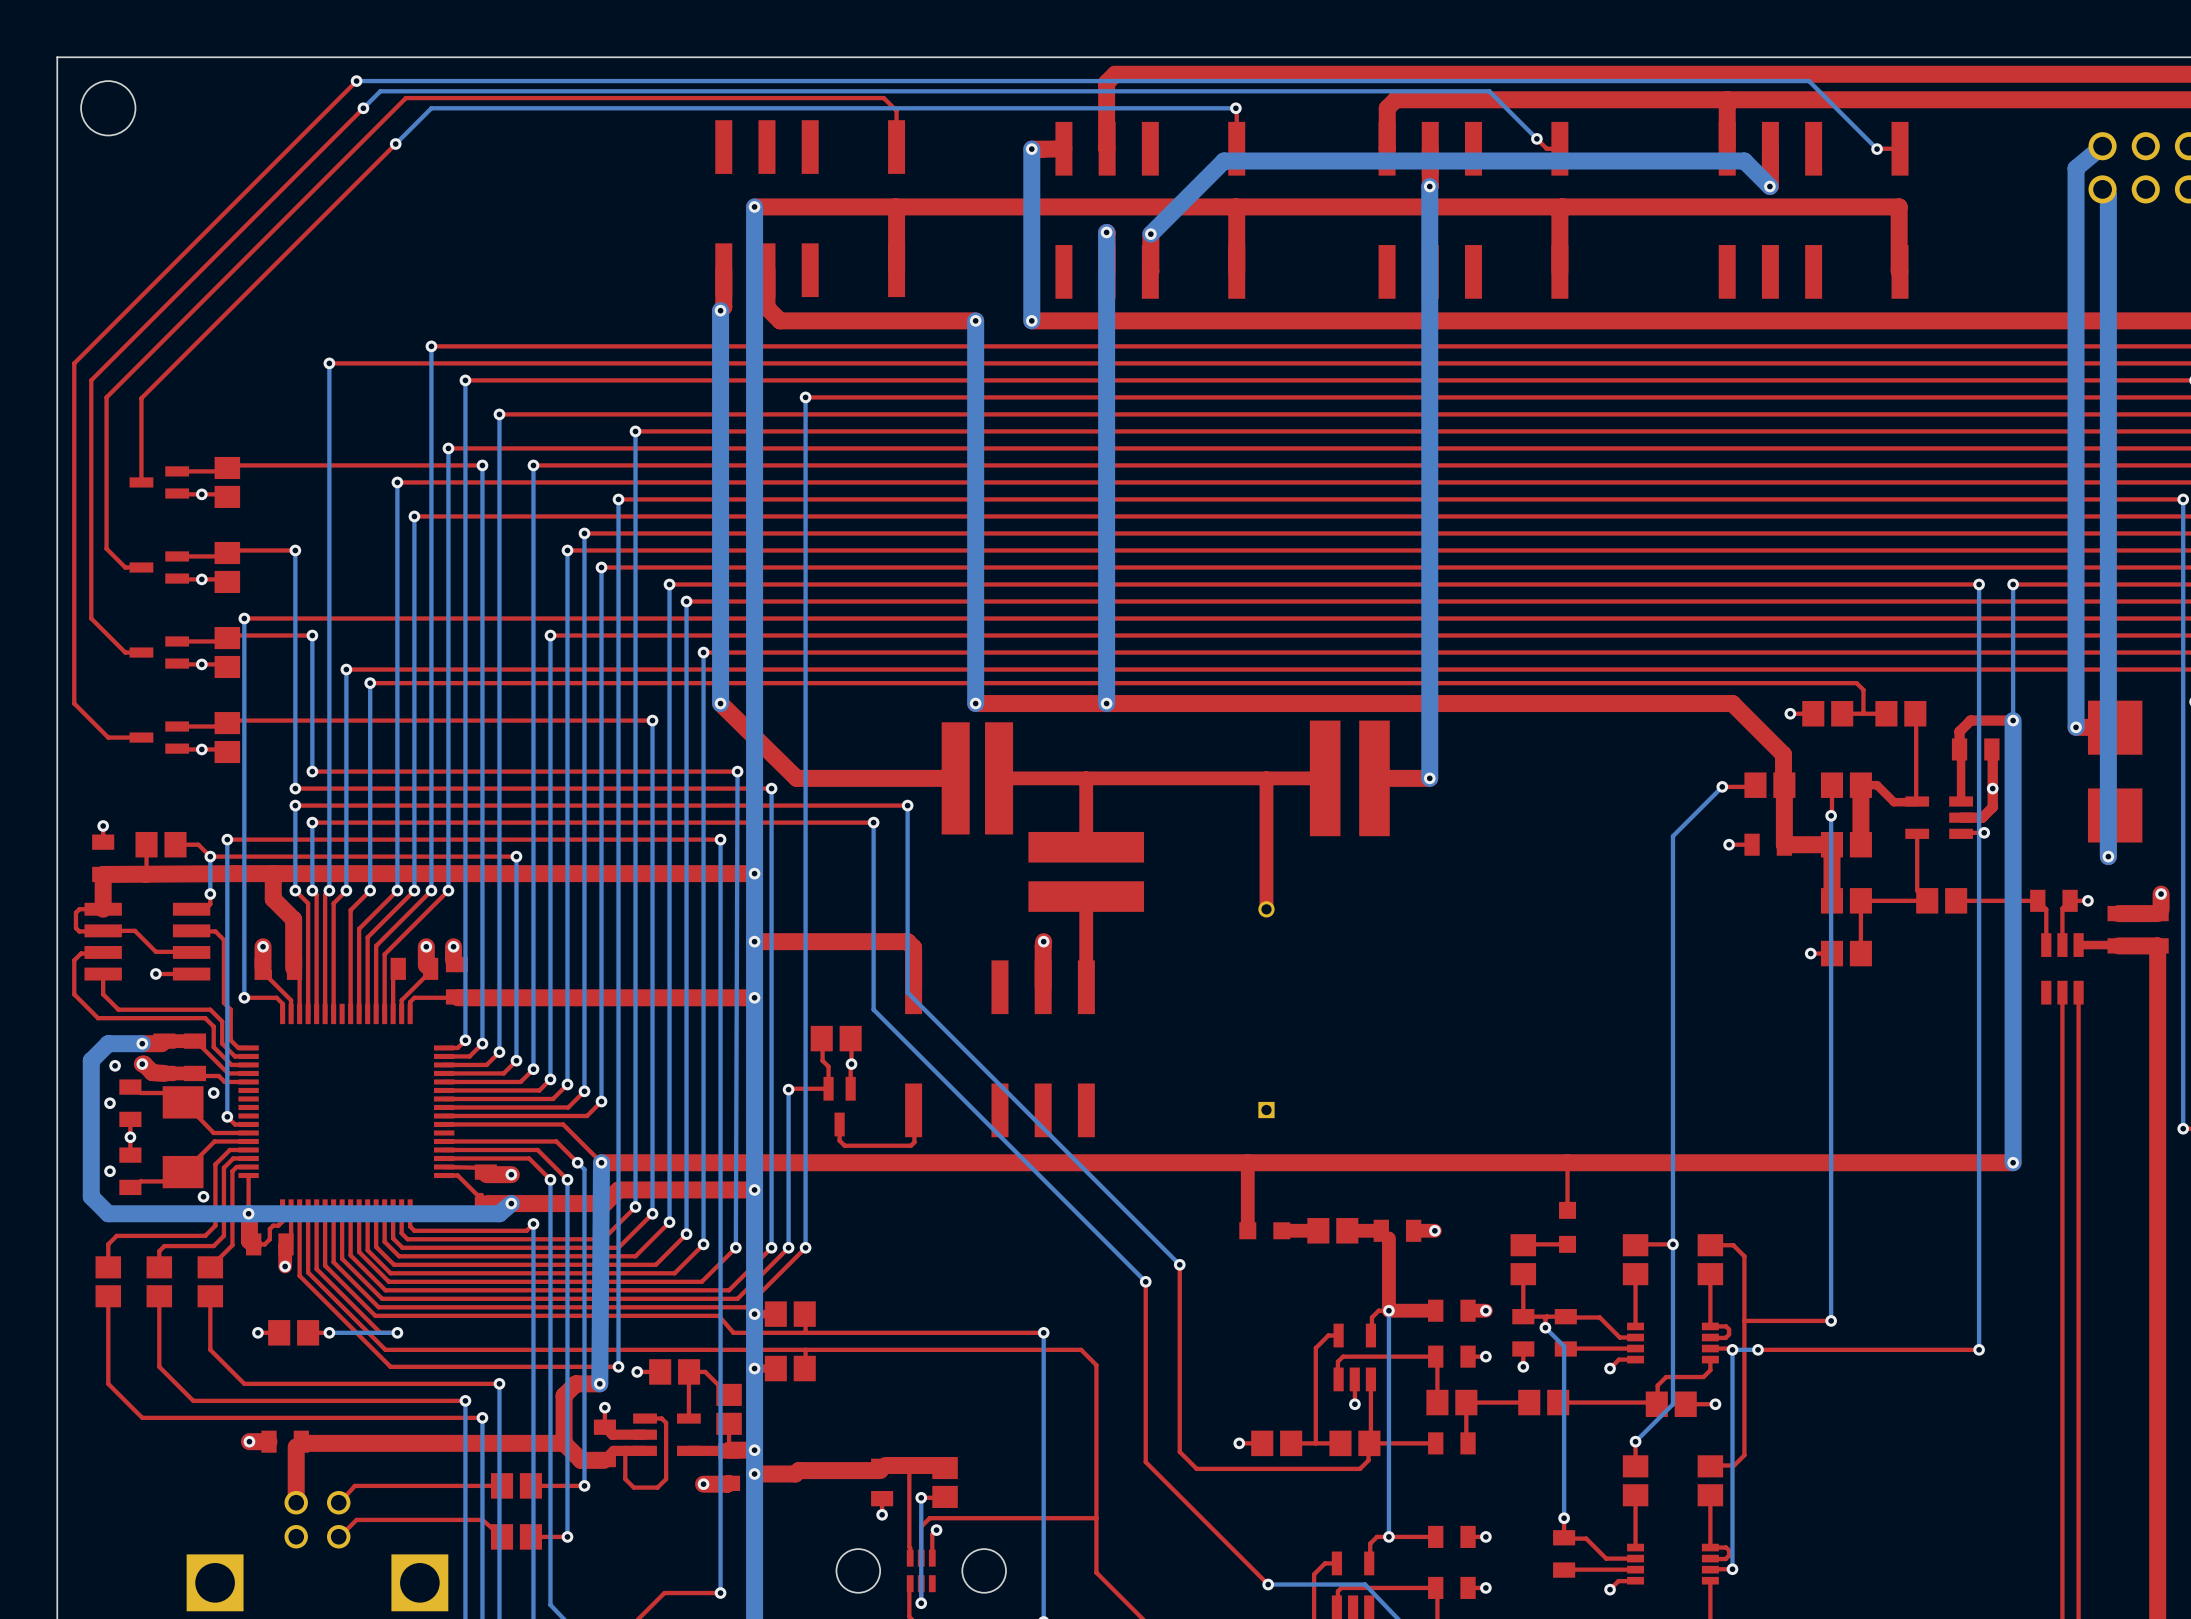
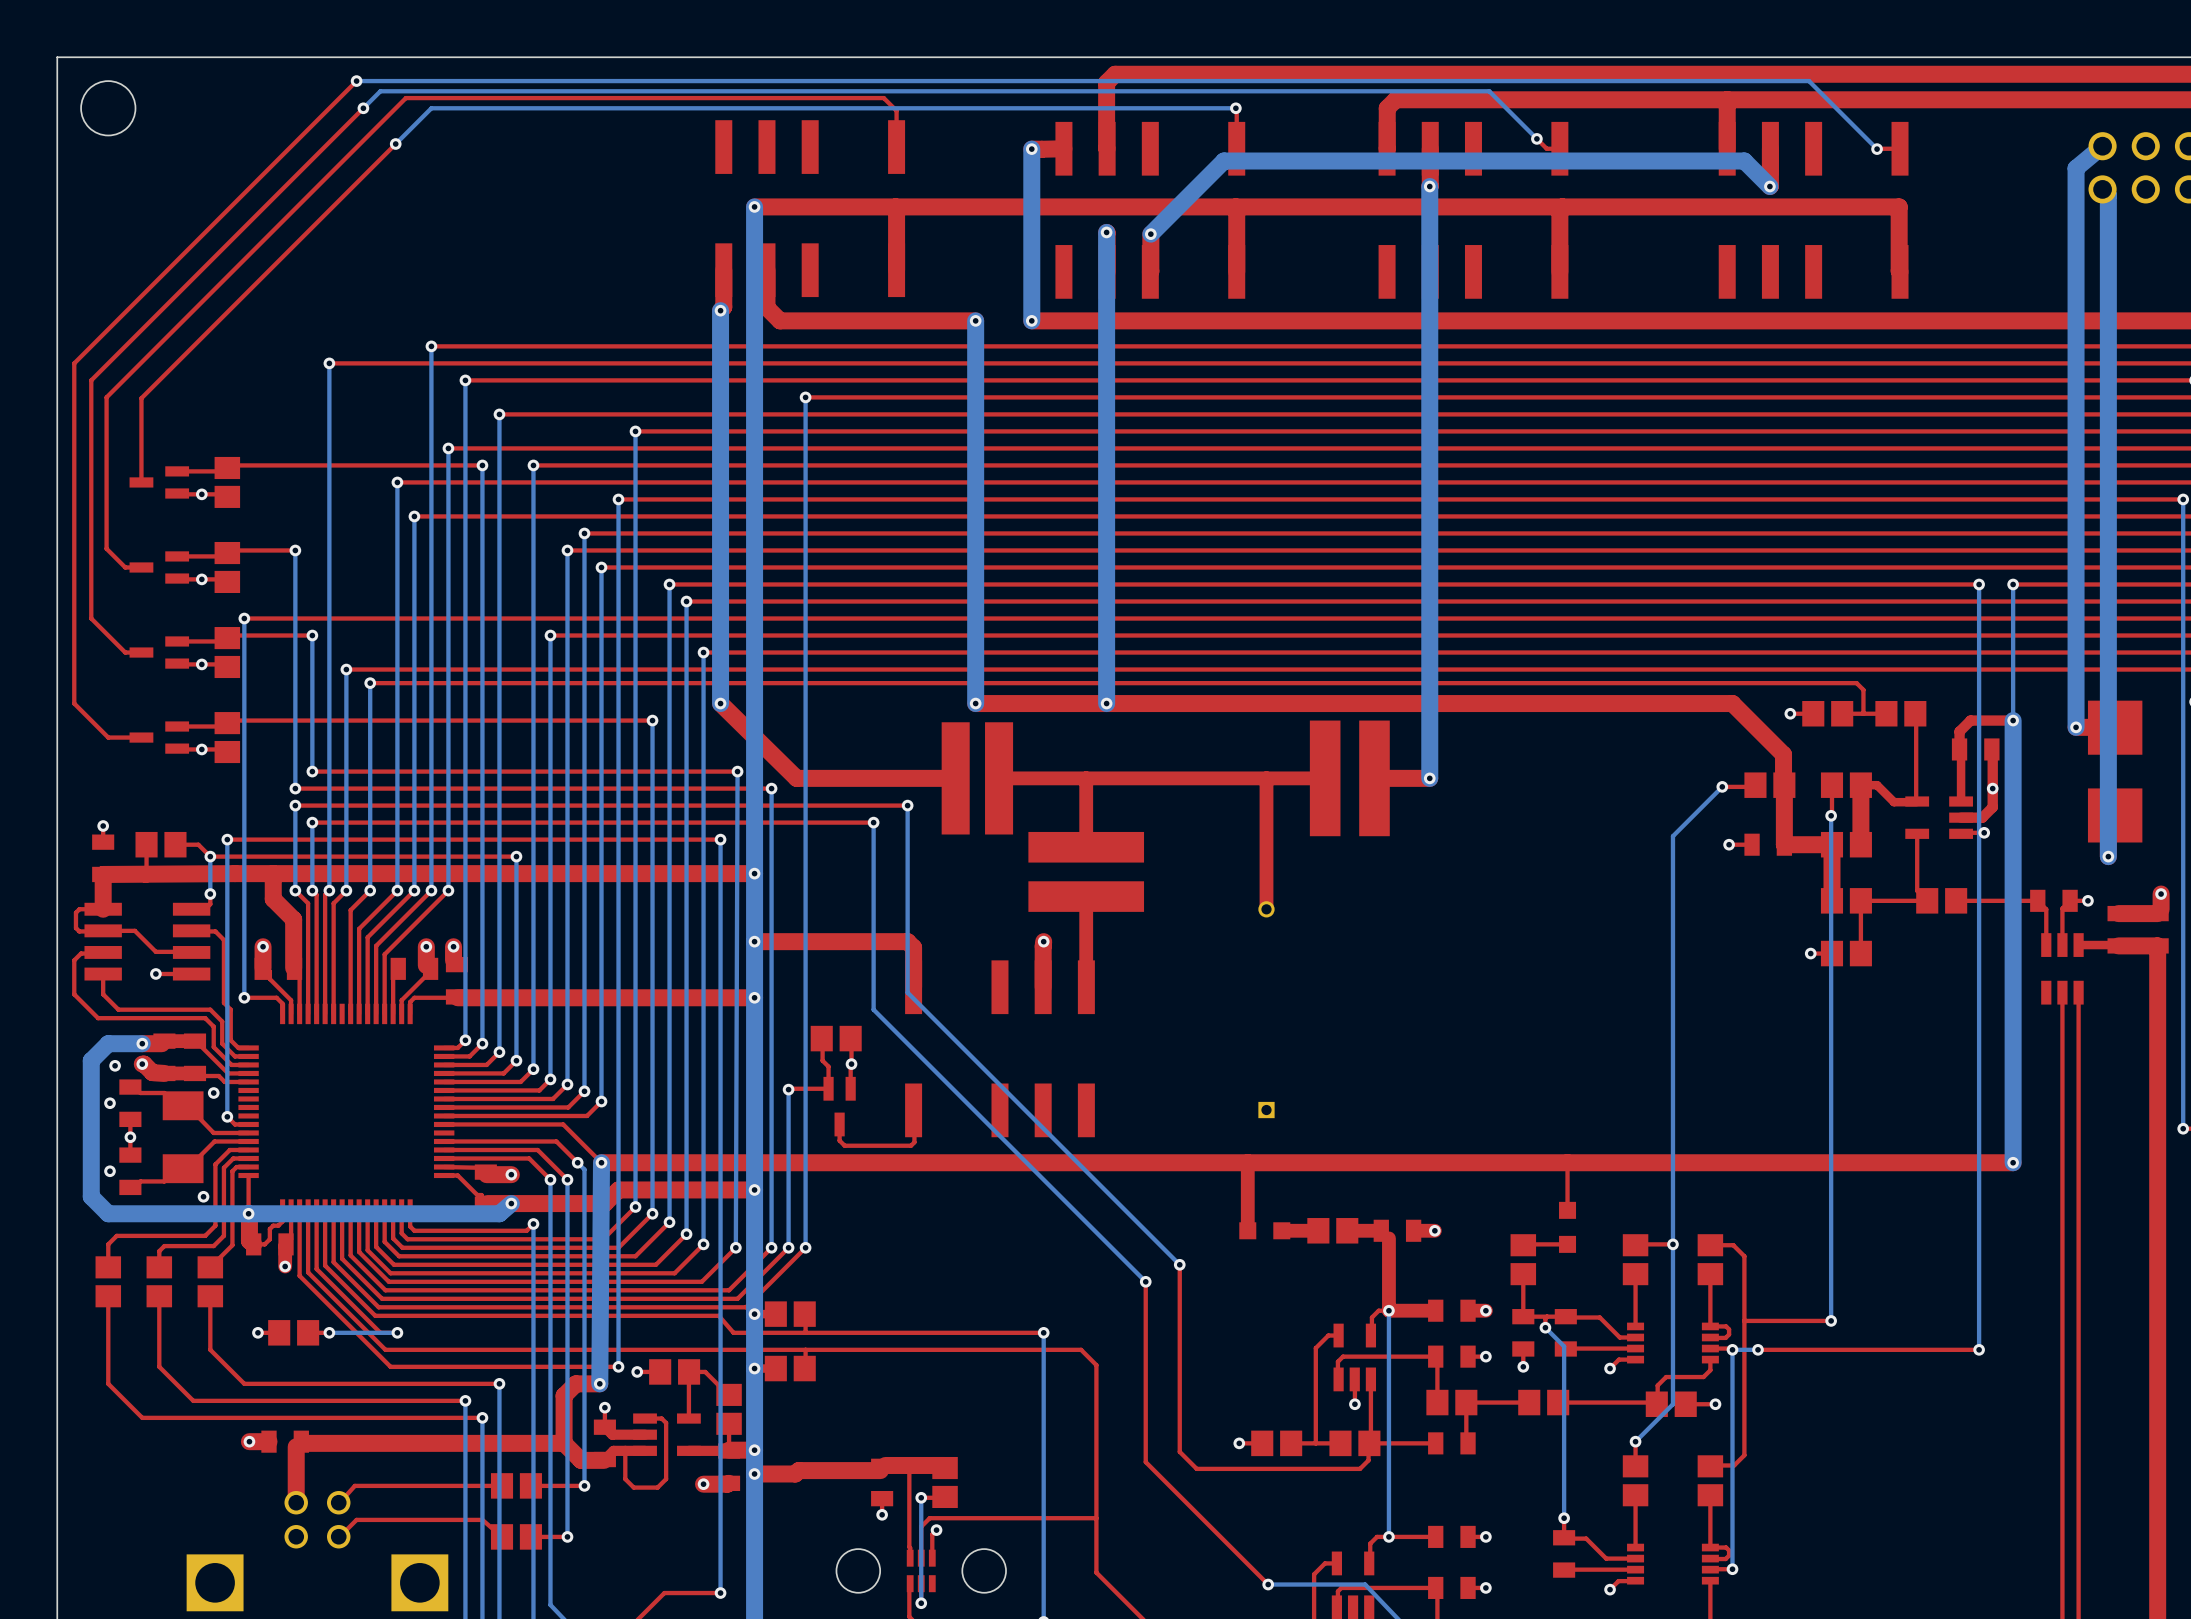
part footprint: [162, 1086, 204, 1189] -> [162, 1091, 204, 1184]

